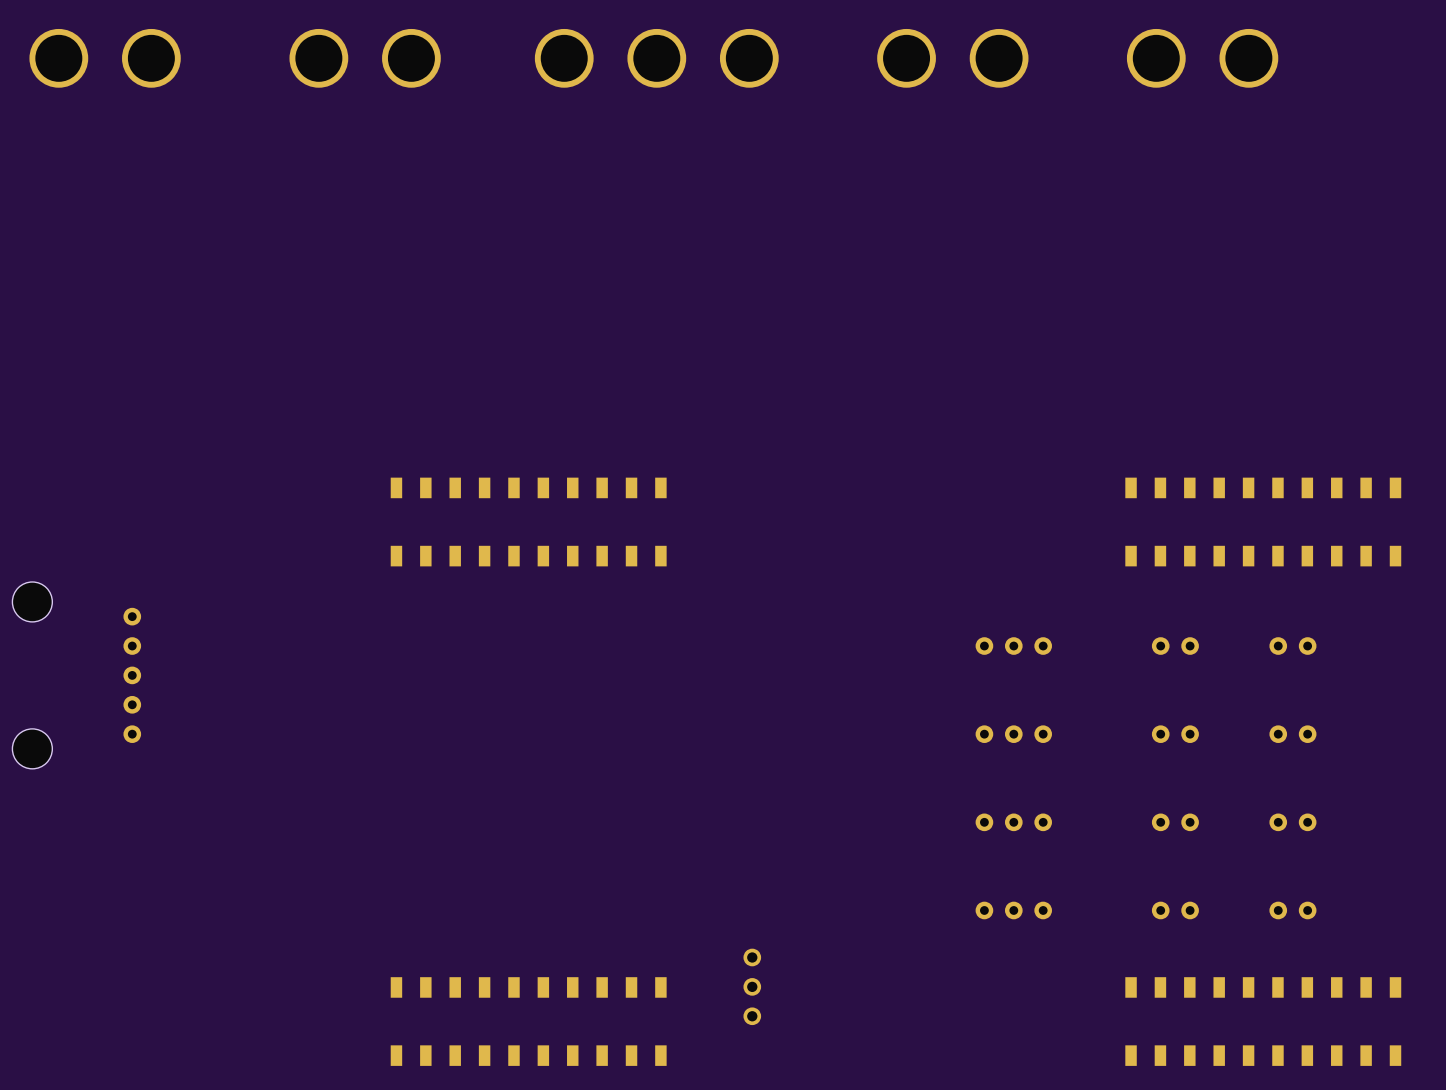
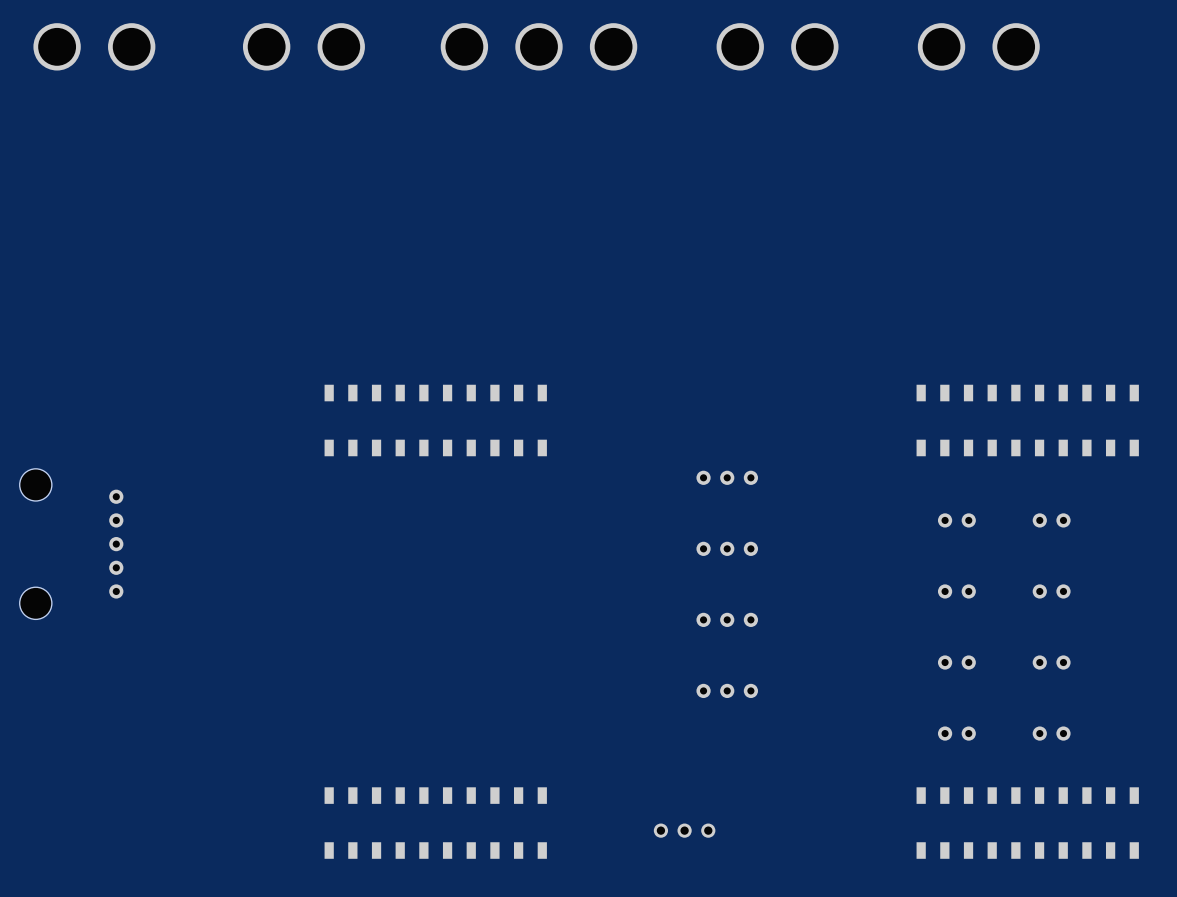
part: none -> (727, 477)
part: (1013, 646) -> none
part: none -> (727, 548)
part: (1013, 734) -> none
part: none -> (727, 619)
part: (1013, 822) -> none
part: none -> (727, 690)
part: (1013, 910) -> none
part rotation: 0° (752, 986) -> 90° clockwise (684, 830)
part position: (752, 986) -> (684, 830)

